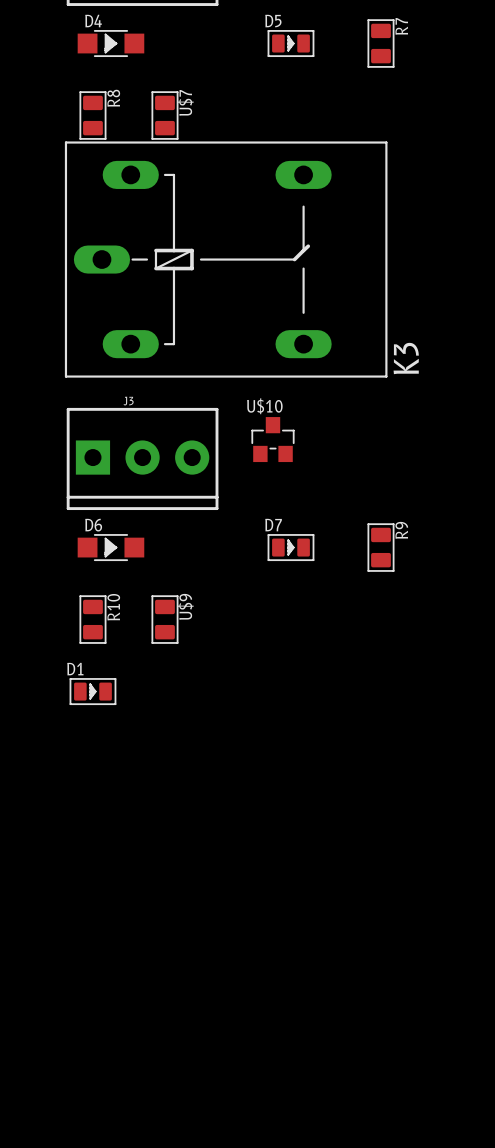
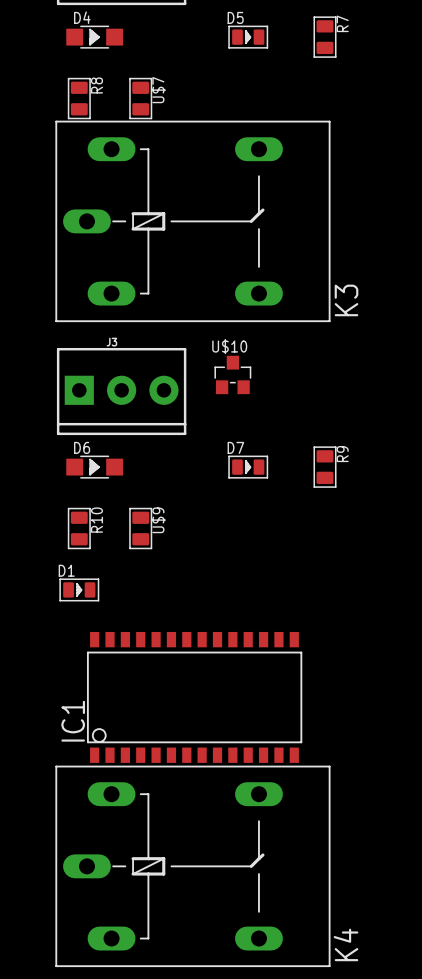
IC1: none -> (194, 697)
K4: none -> (192, 866)

